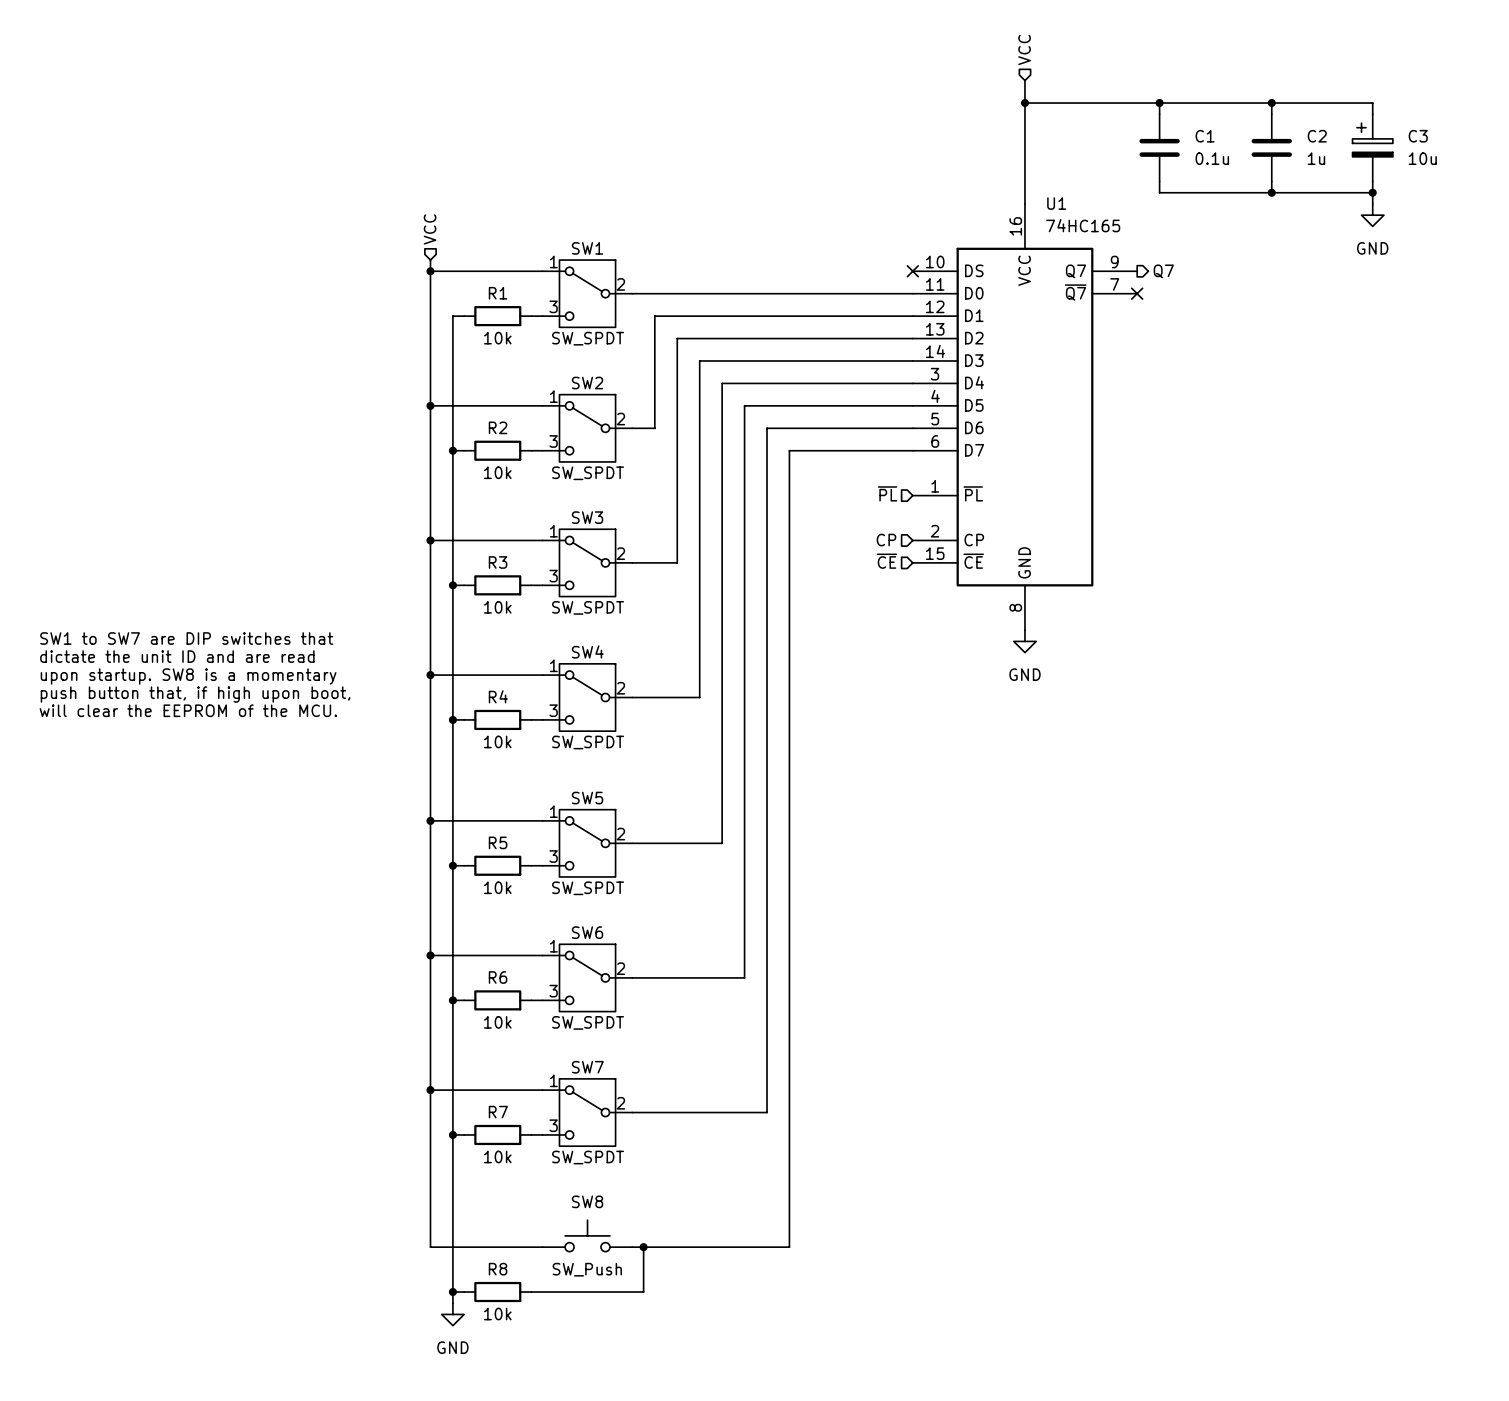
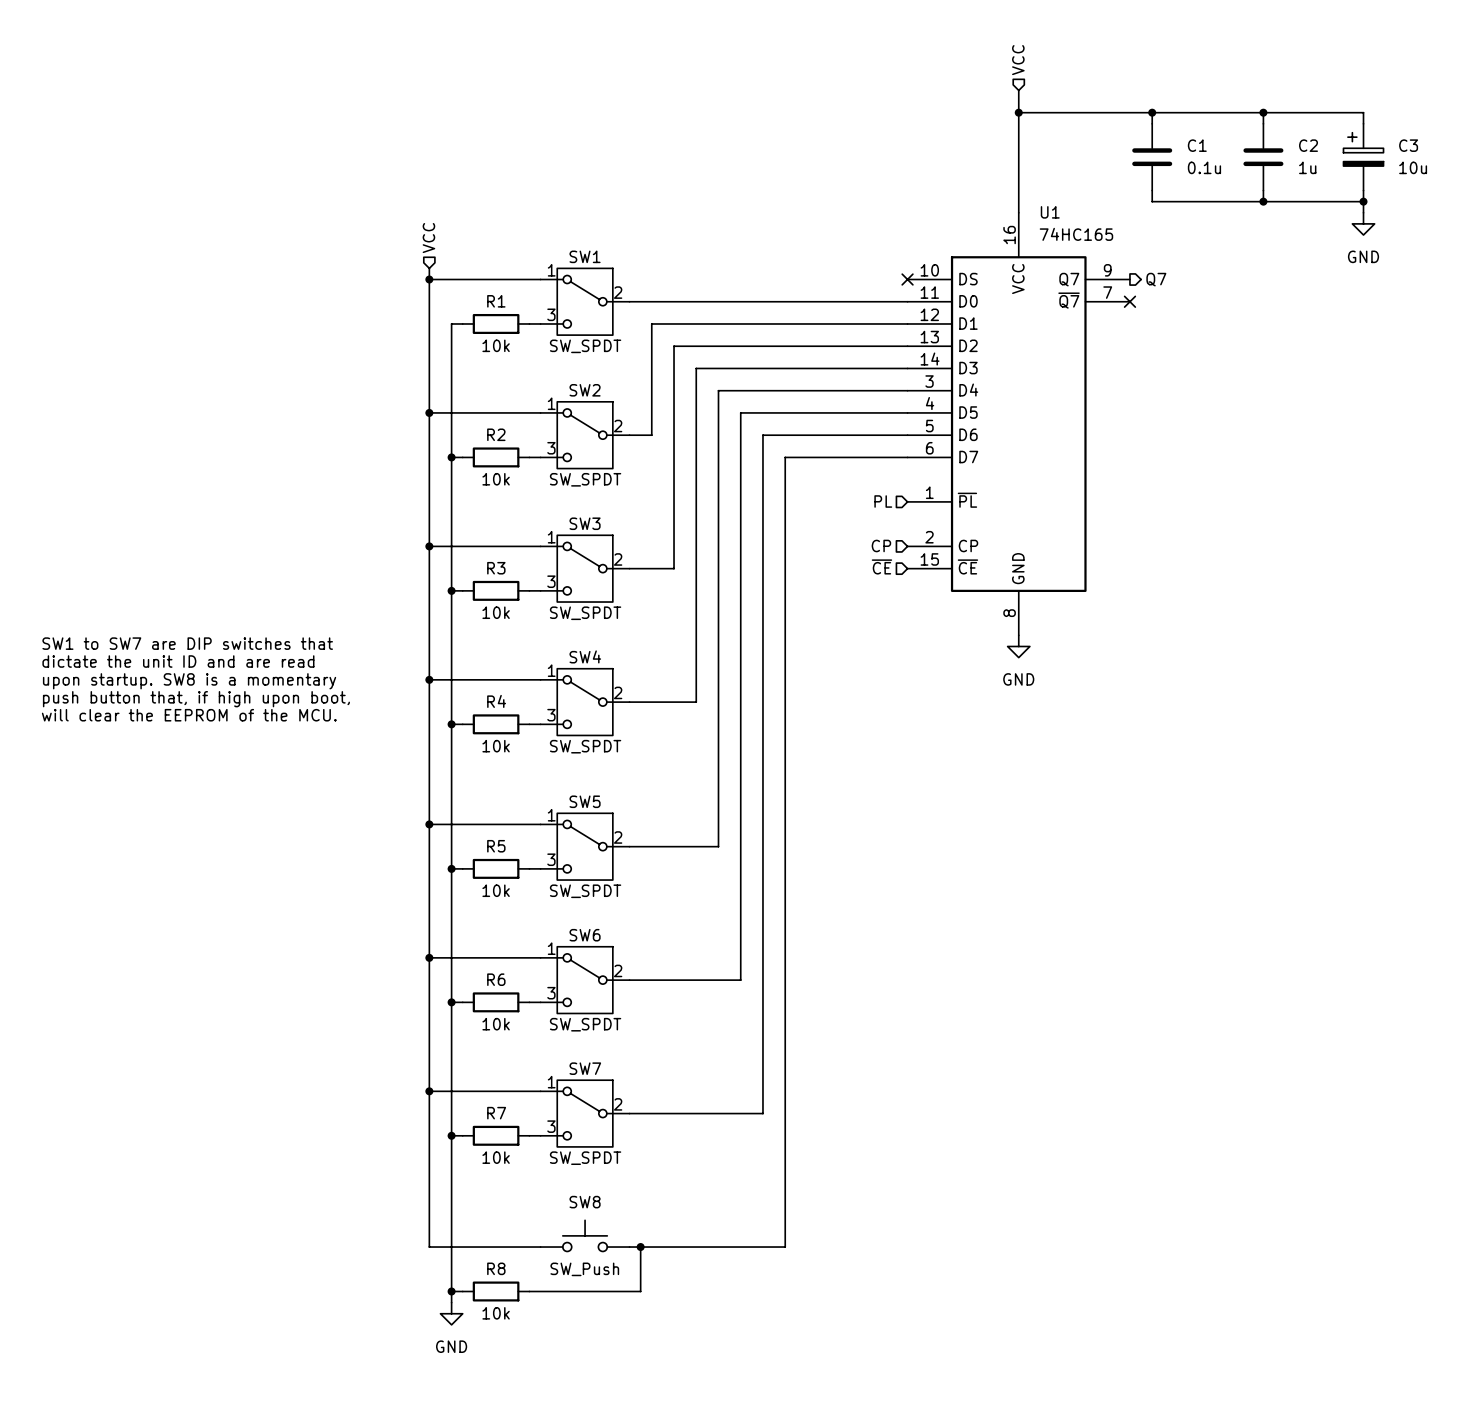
hierarchical label: ~{PL} (887, 493) -> PL (883, 501)

